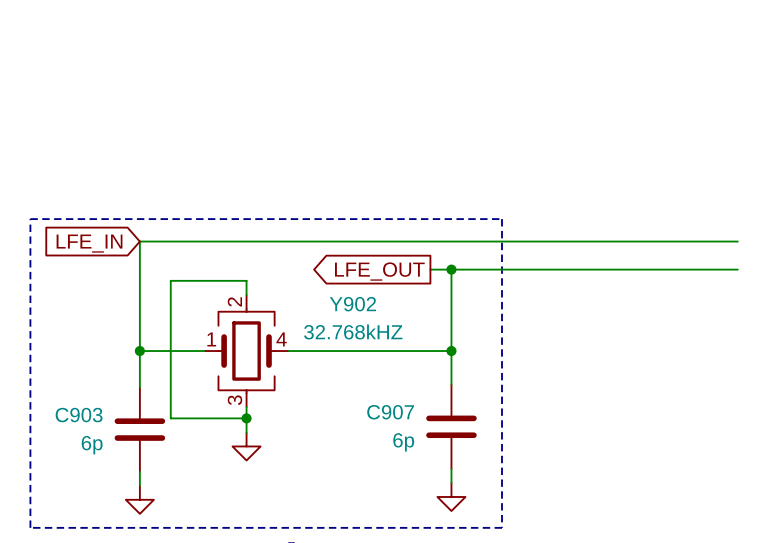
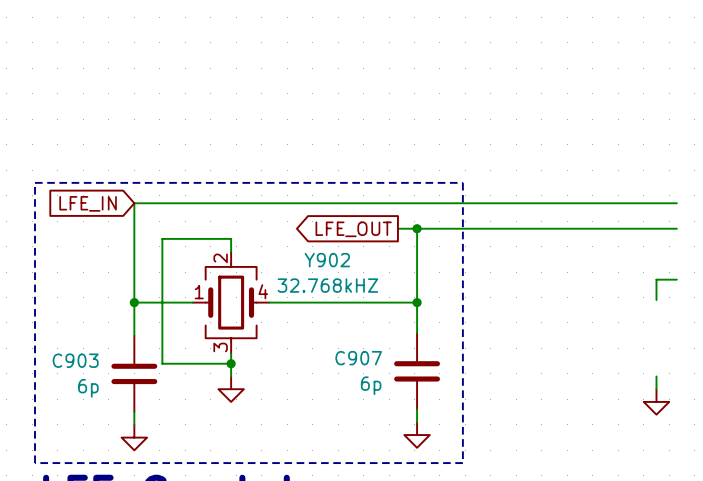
wire: none -> (676, 279) (656, 279) (656, 300)
wire: none -> (656, 376) (656, 389)
power symbol: none -> (656, 401)

